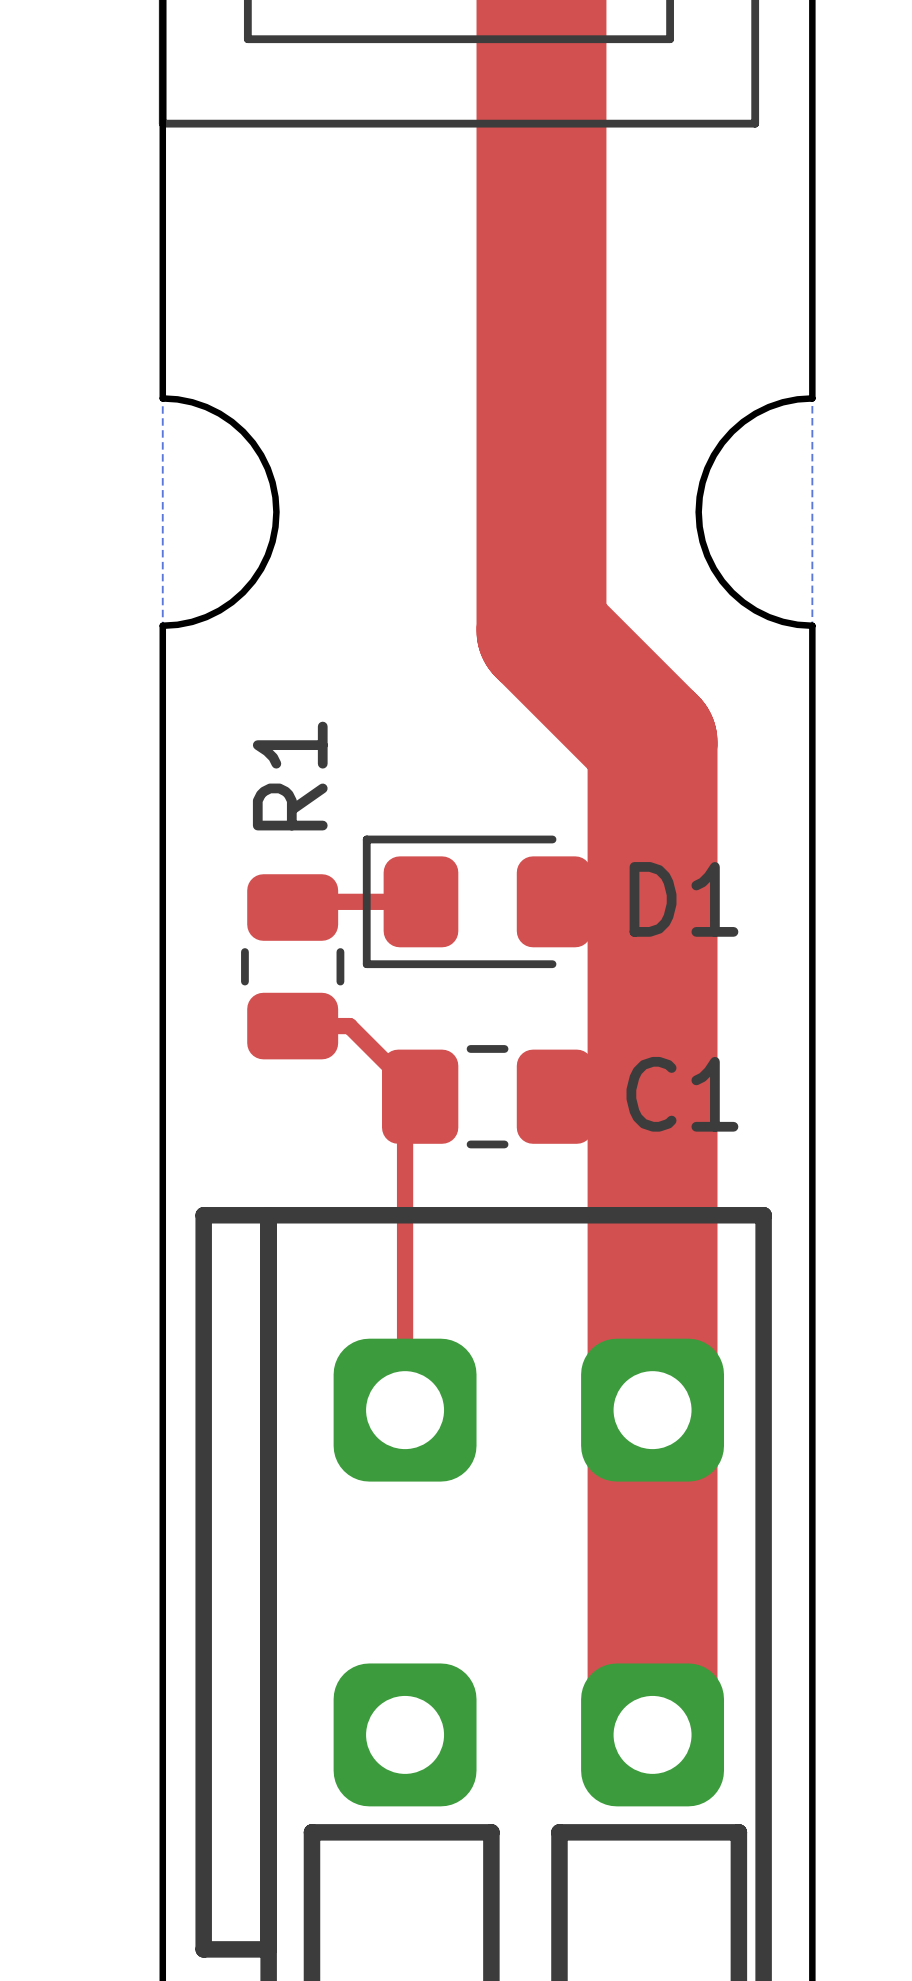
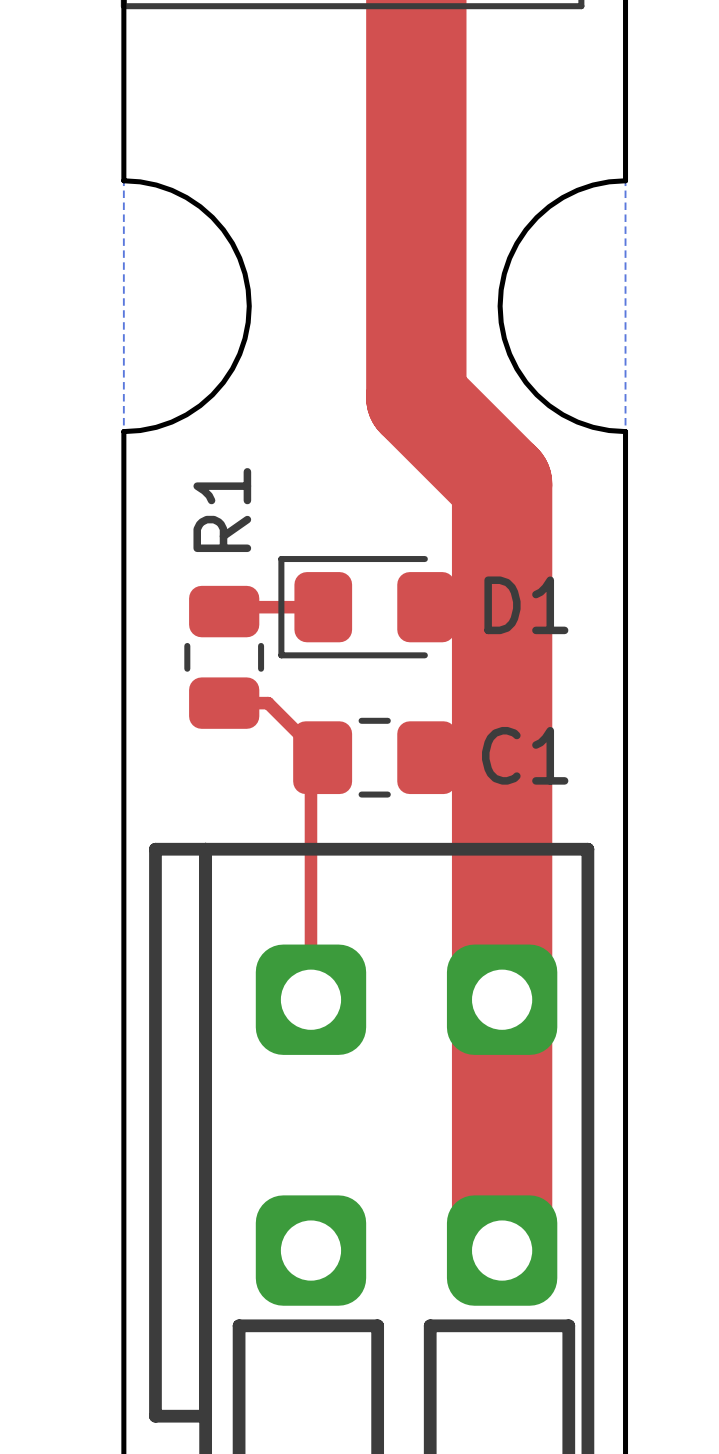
board edge: (162, 349) (162, 398) (192, 402) (206, 407) (231, 421) (243, 431) (252, 442) (267, 468) (272, 482) (276, 512) (272, 541) (267, 555) (252, 581) (243, 592) (231, 602) (206, 617) (192, 621) (162, 625) (162, 674) -> (123, 180) (140, 181) (171, 190) (200, 206) (212, 217) (223, 229) (239, 258) (248, 289) (249, 306) (248, 322) (239, 354) (223, 382) (212, 394) (200, 405) (171, 422) (140, 430) (123, 431)
board edge: (812, 349) (812, 398) (782, 402) (768, 407) (743, 421) (731, 431) (722, 442) (707, 468) (702, 482) (698, 512) (702, 541) (707, 555) (722, 581) (731, 592) (743, 602) (768, 617) (782, 621) (812, 625) (812, 674) -> (625, 180) (609, 181) (577, 190) (549, 206) (536, 217) (526, 229) (509, 258) (501, 289) (500, 306) (501, 322) (509, 354) (526, 382) (536, 394) (549, 405) (577, 422) (609, 430) (625, 431)

